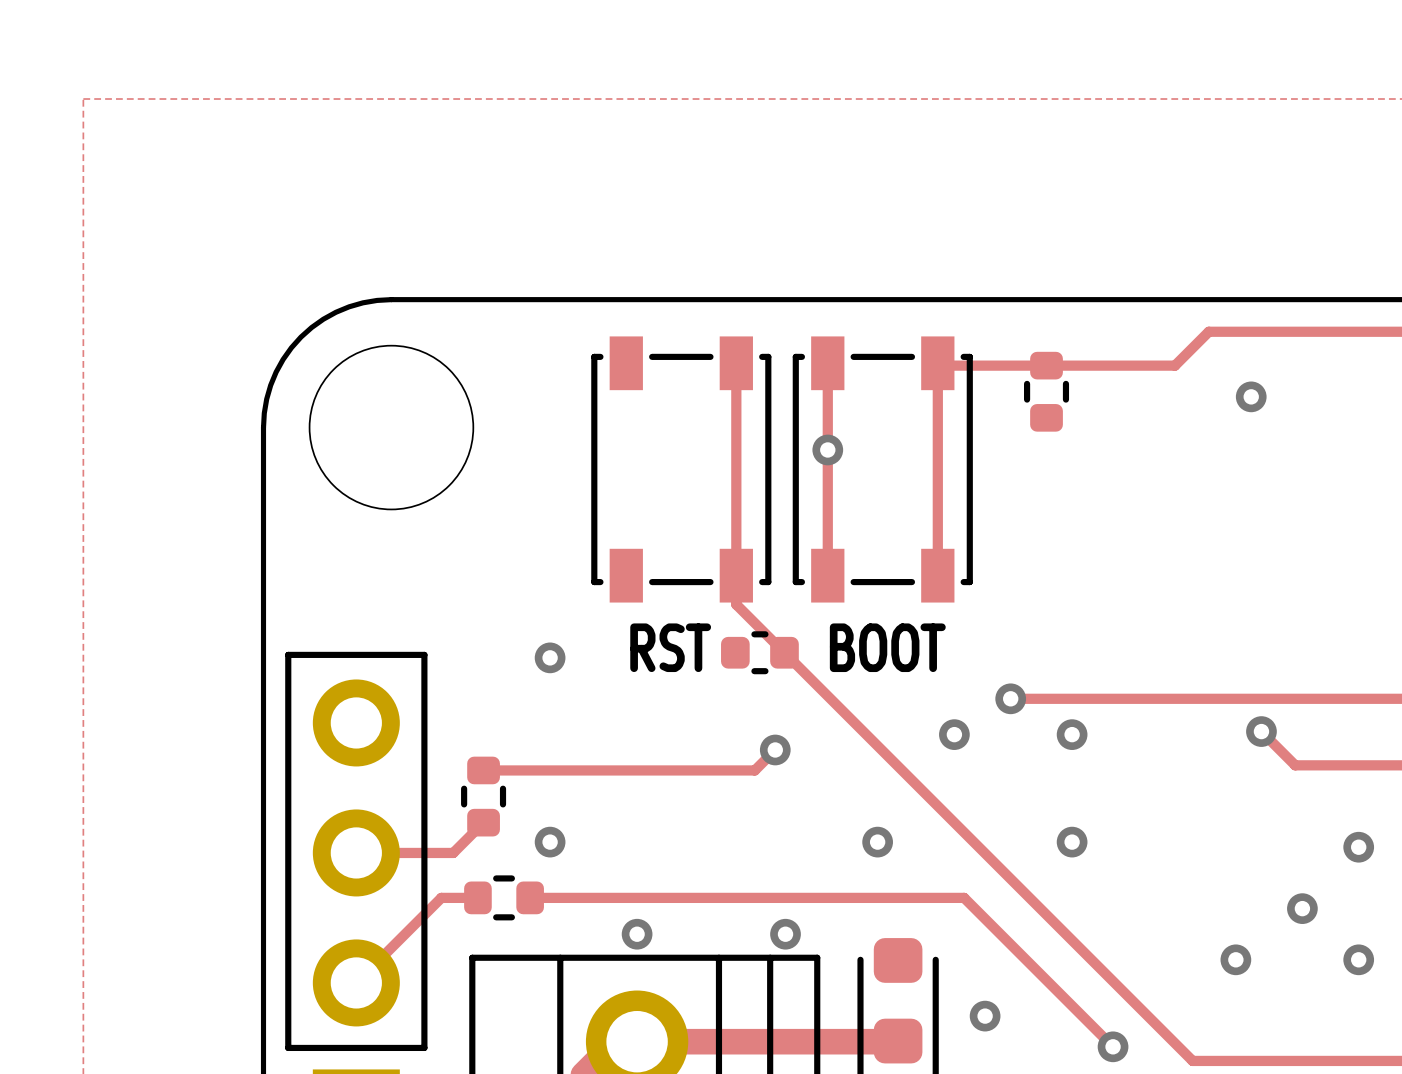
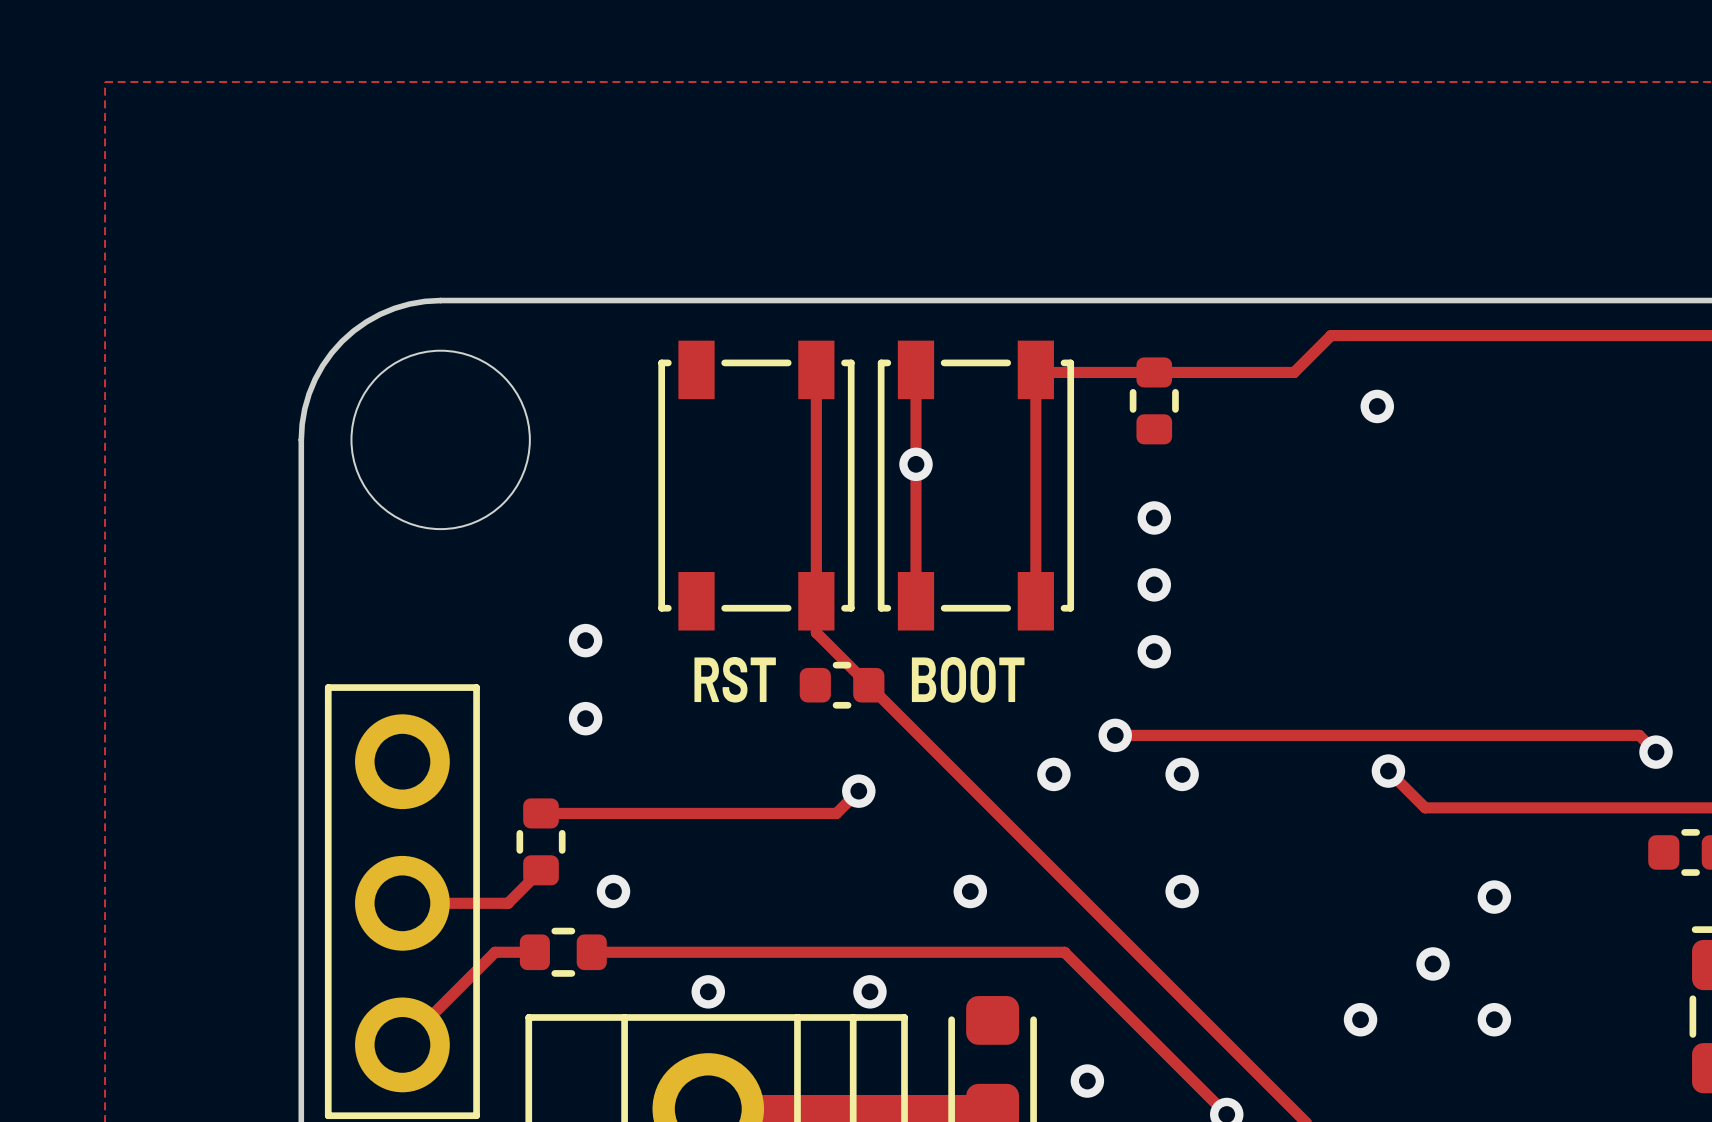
via: none -> (1154, 517)
via: none -> (1154, 584)
via: none -> (585, 640)
via: none -> (1154, 651)
via position: (550, 657) -> (585, 718)

